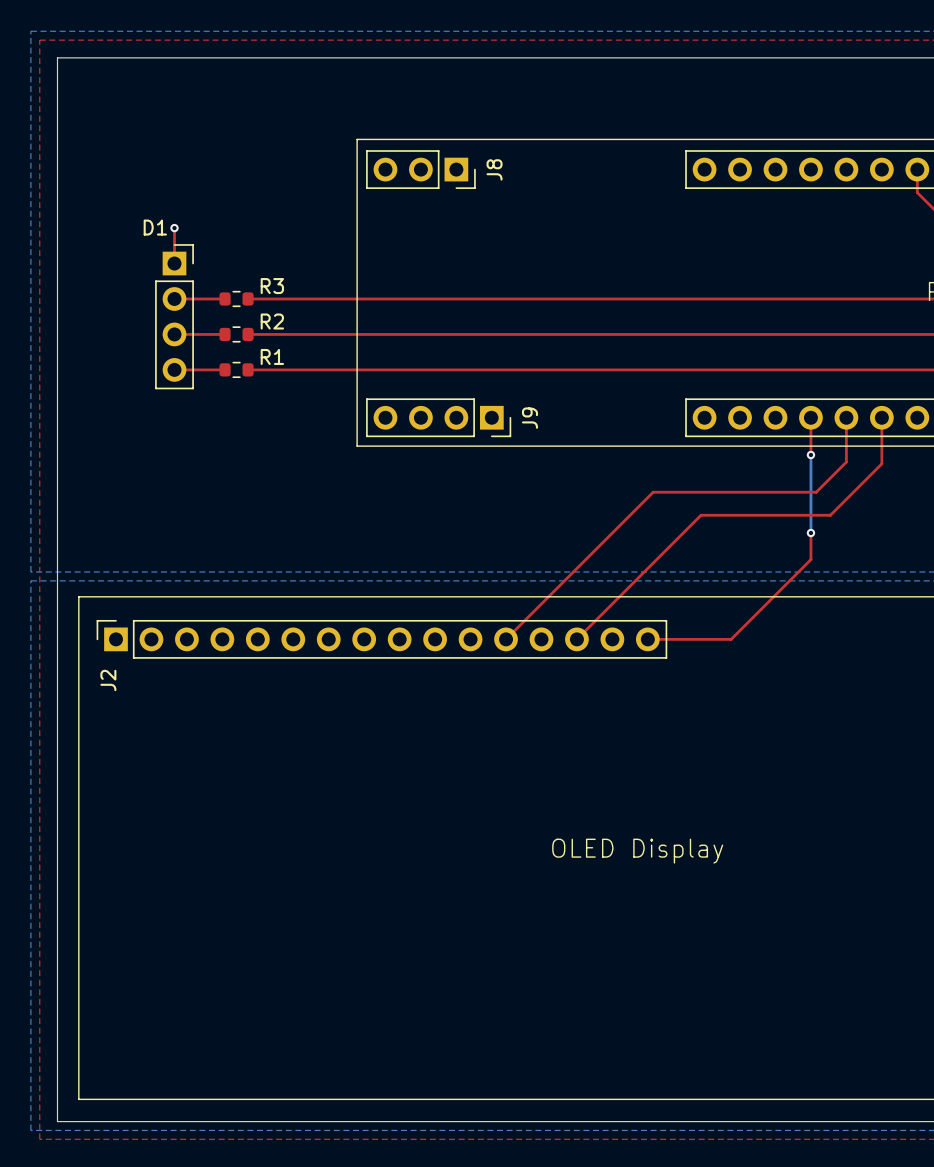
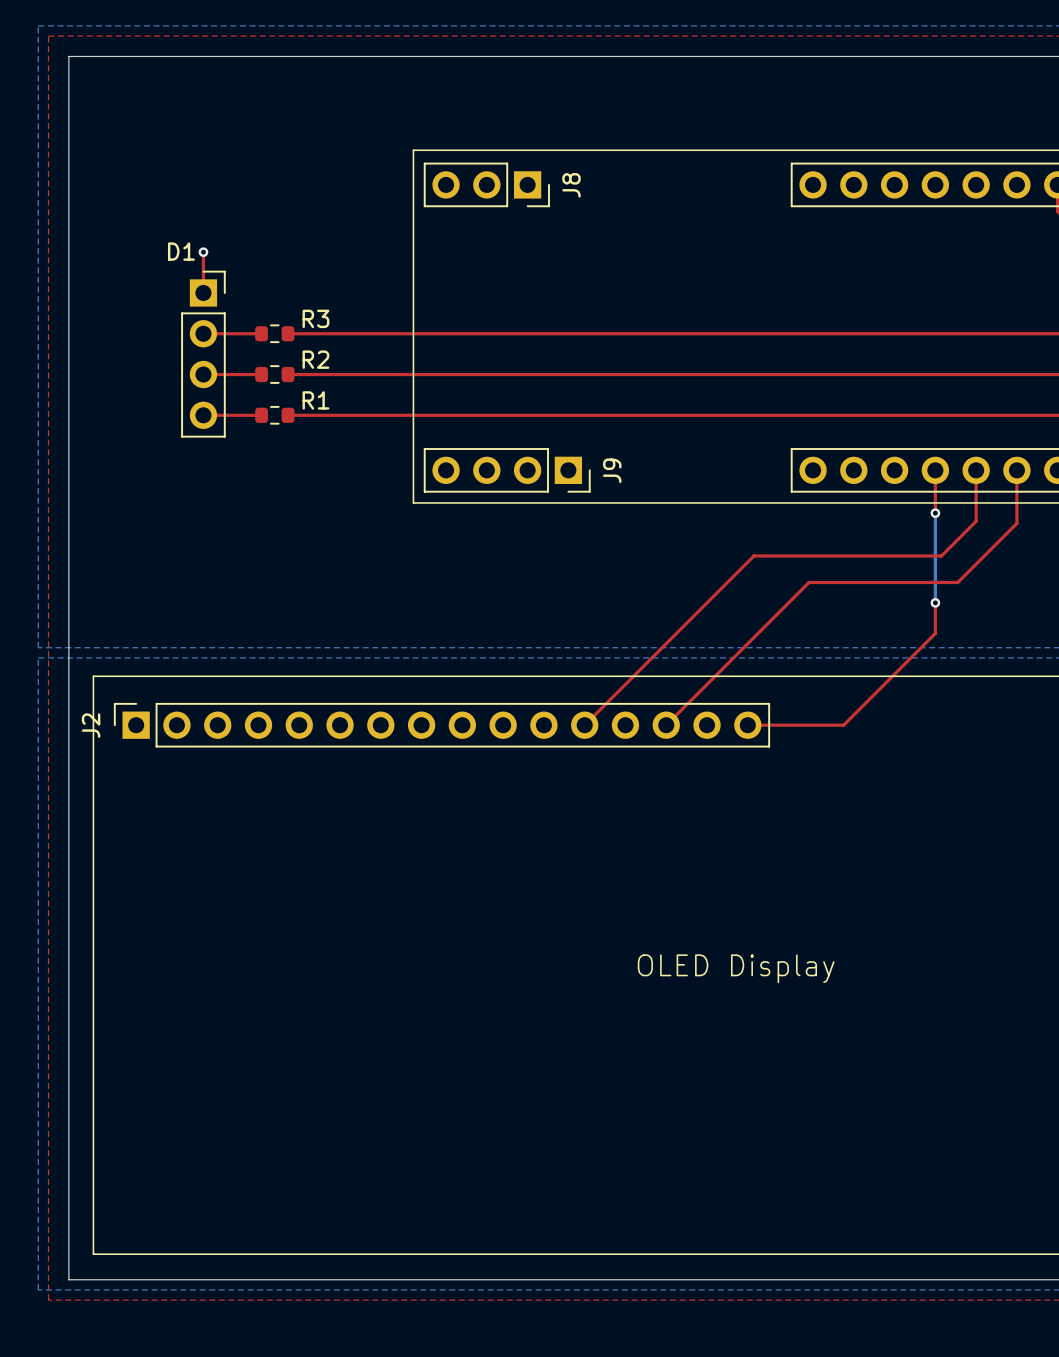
J2 name position: J2 (108, 680) -> J2 (91, 725)

